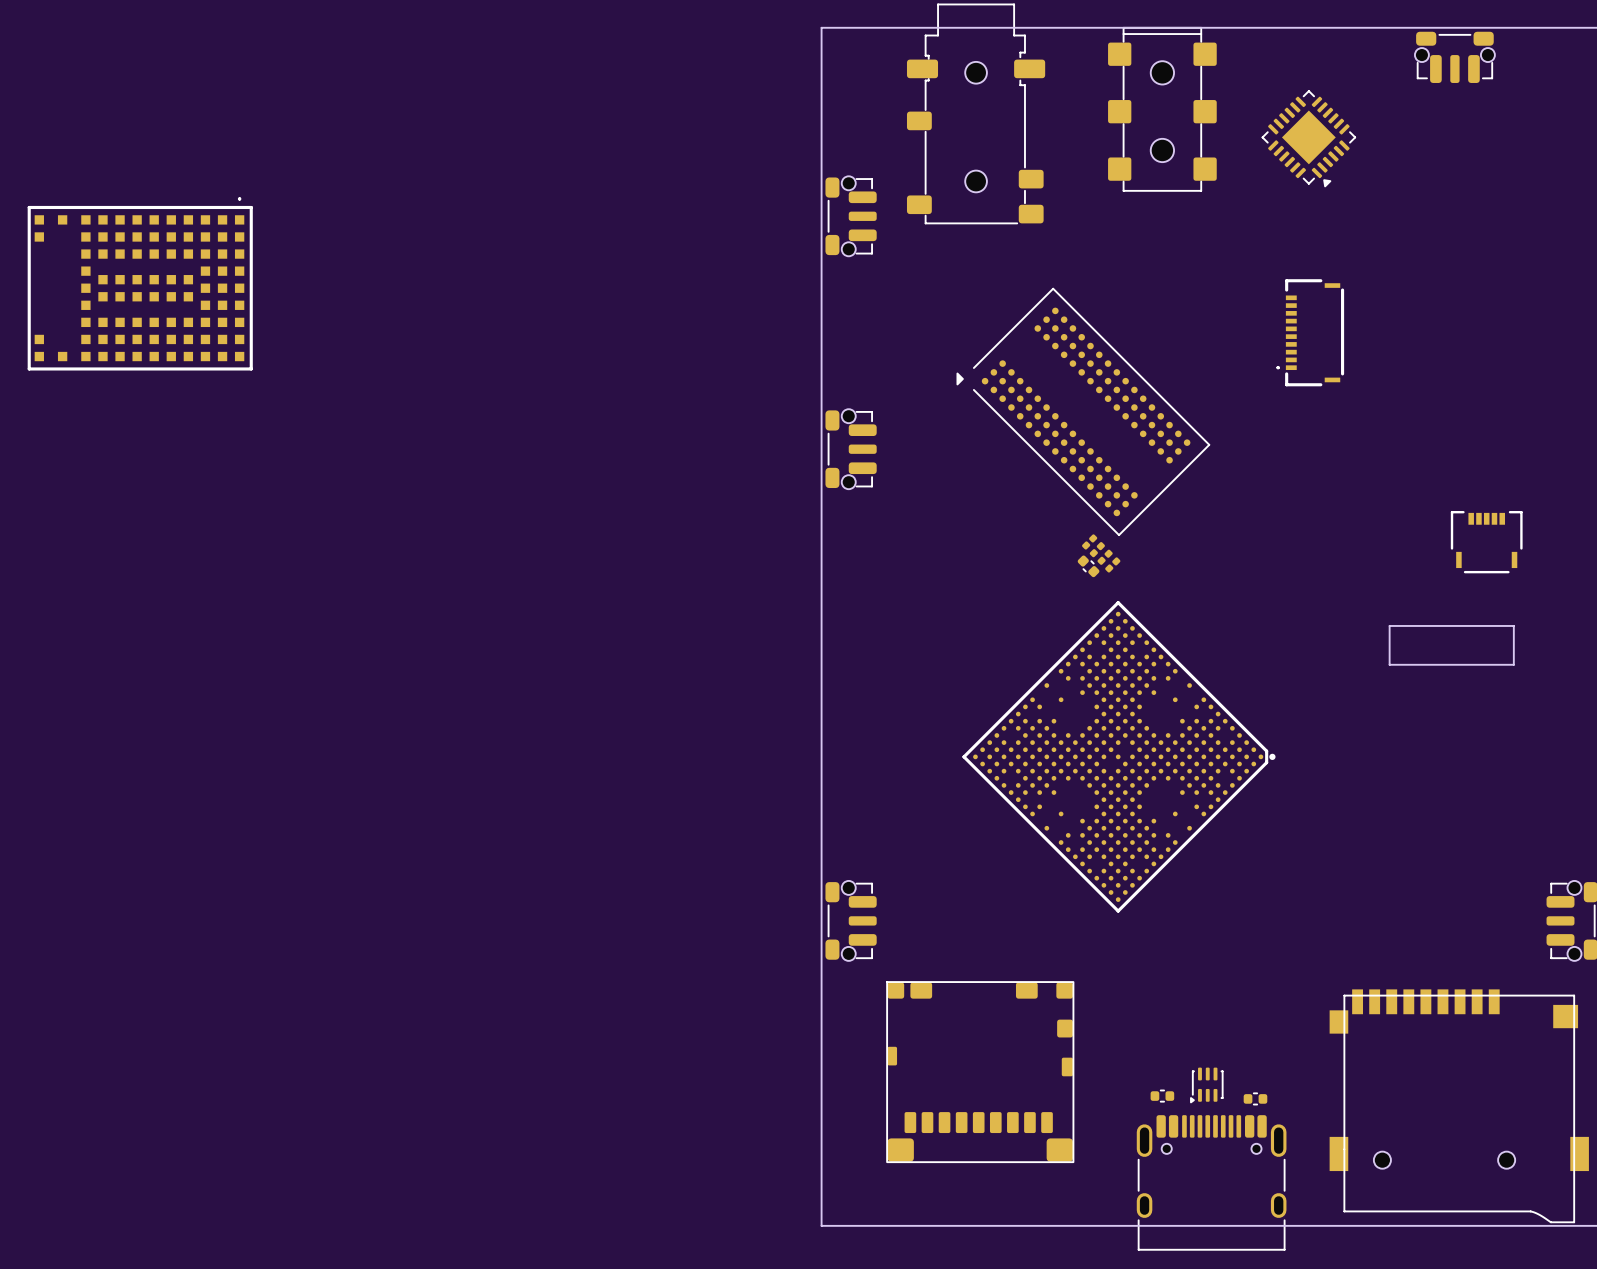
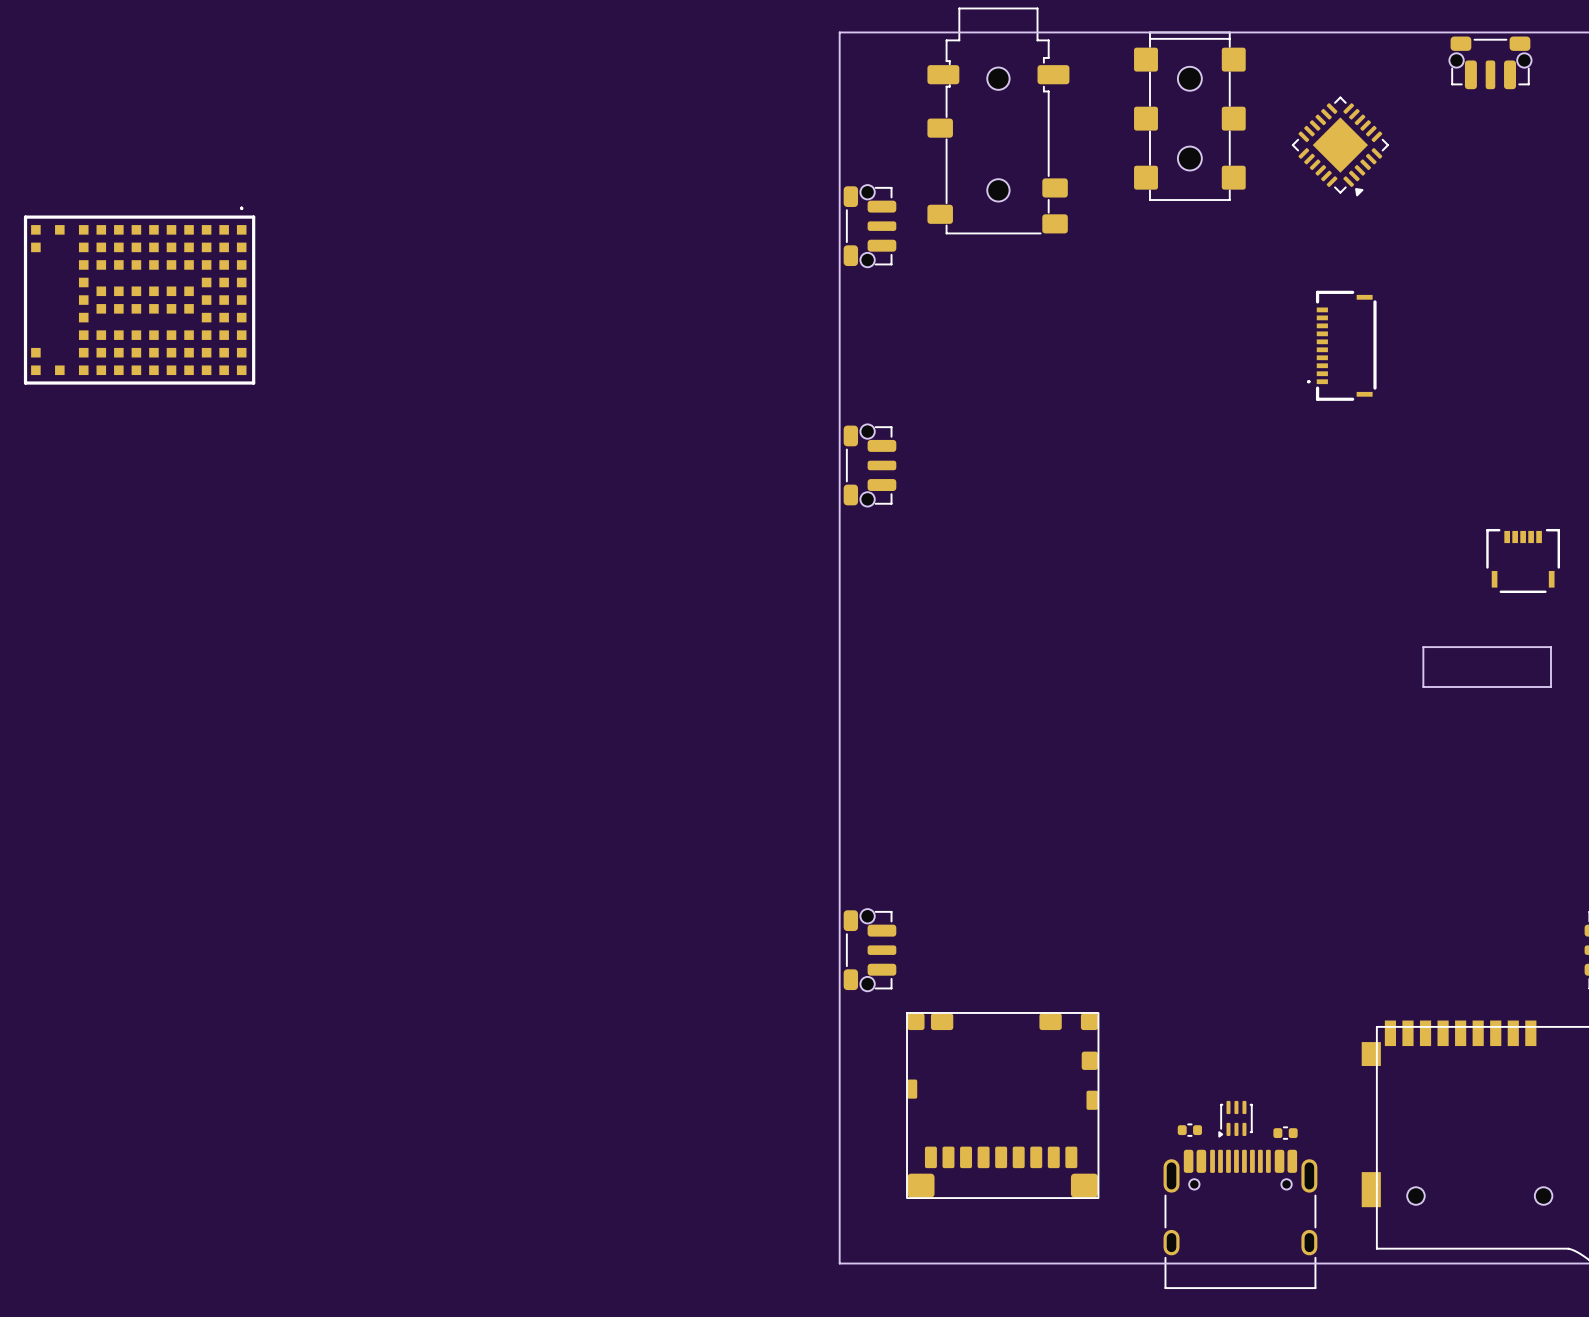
part: (1083, 411) -> none
part: (1089, 541) -> none
part: (1097, 549) -> none
part: (1105, 557) -> none
part: (1112, 564) -> none
part: (1088, 566) -> none
part: (1118, 756) -> none

